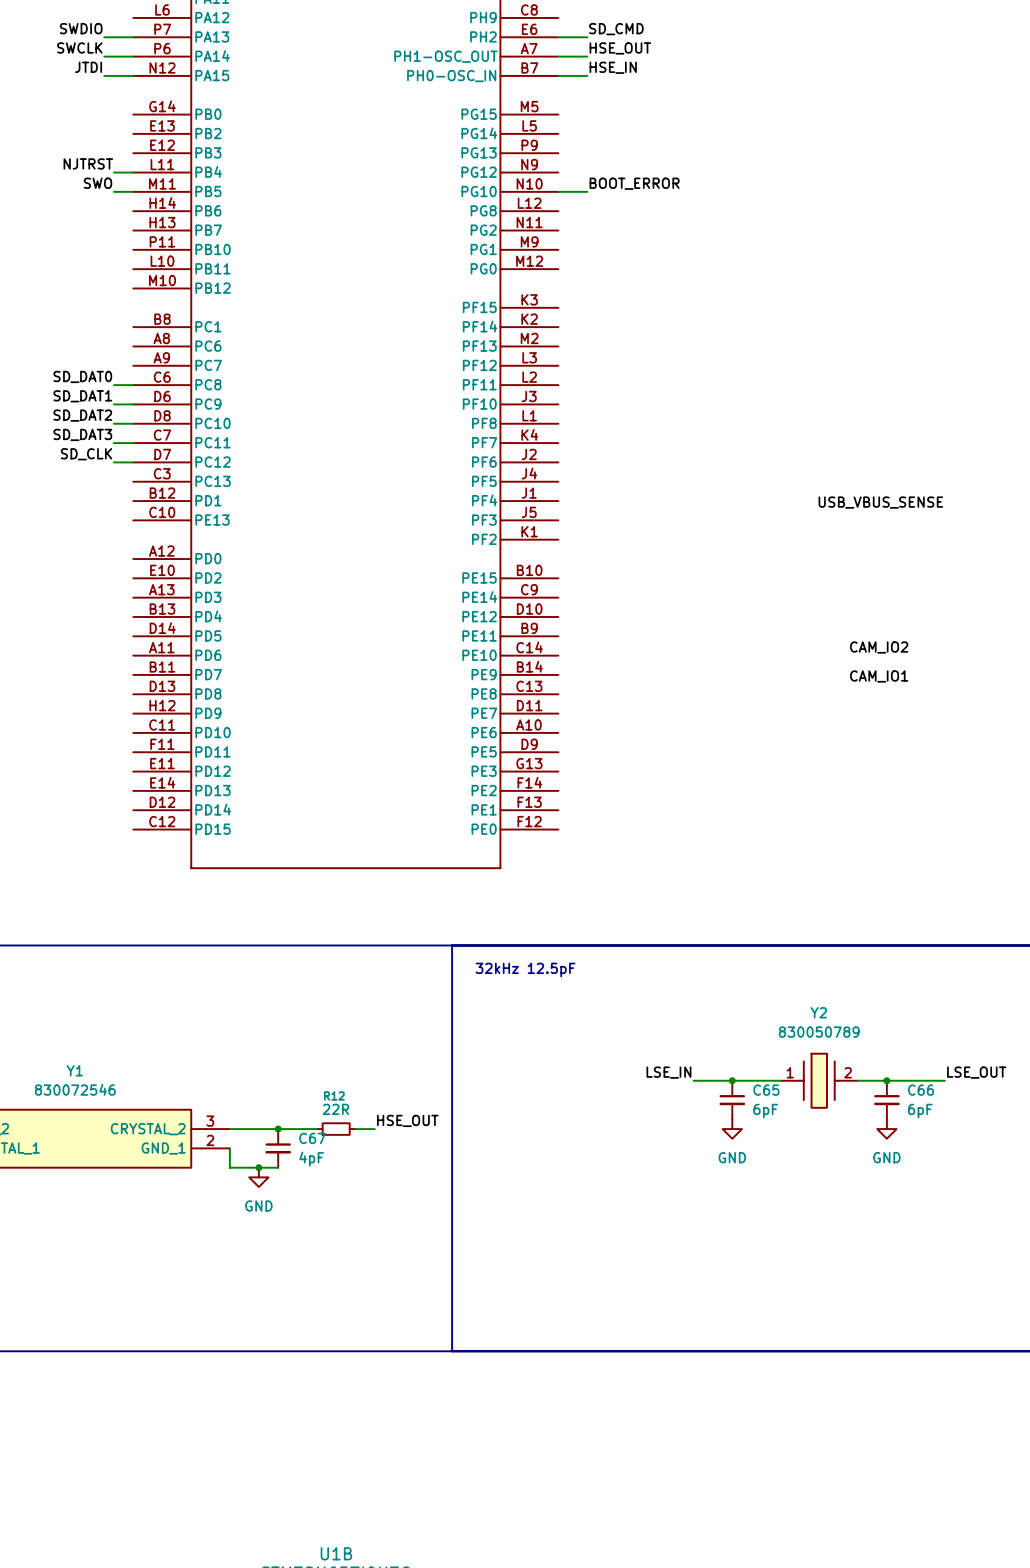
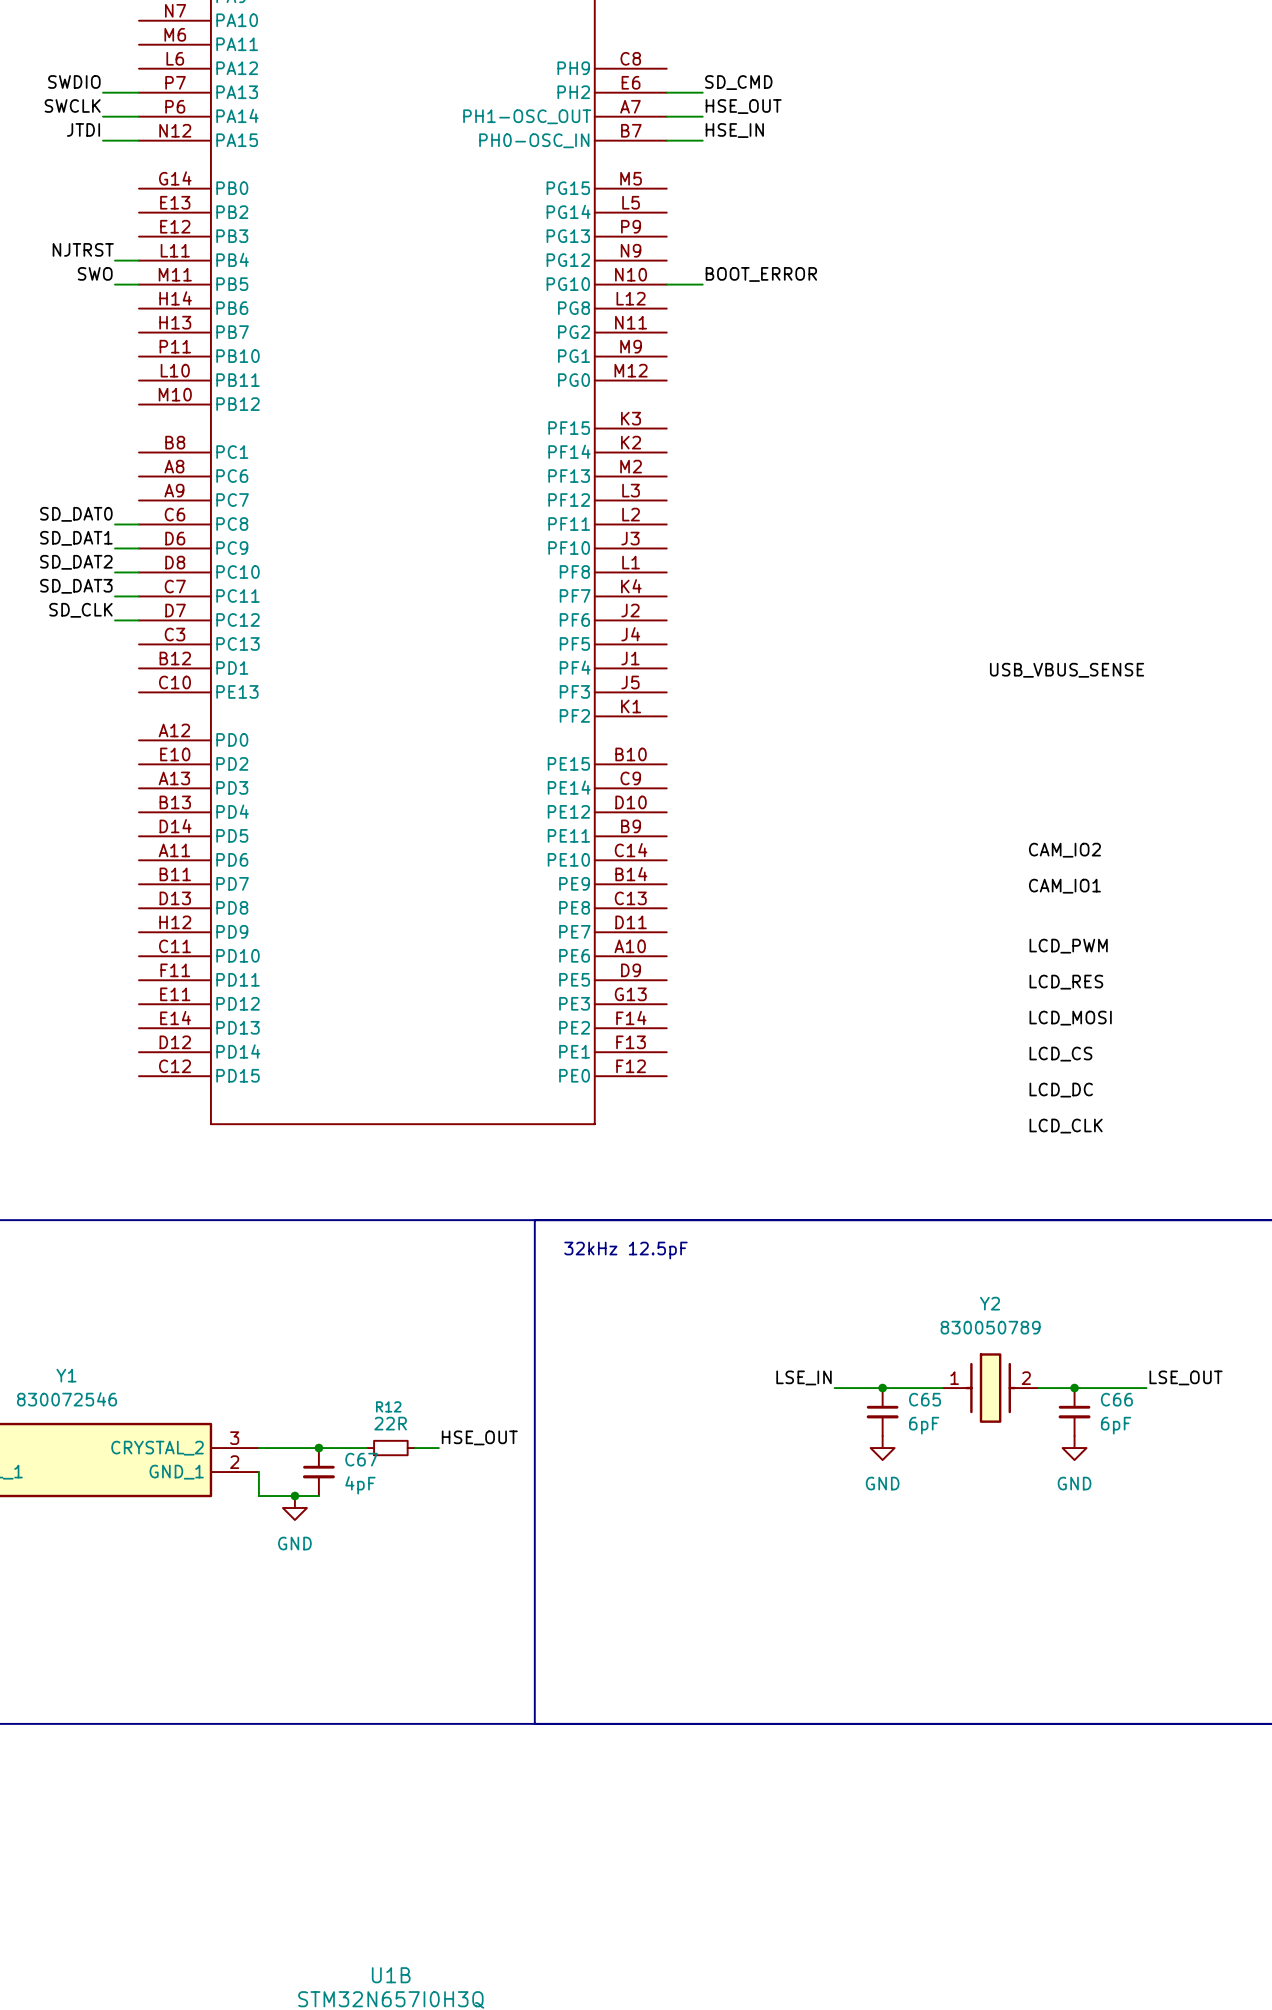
label: none -> LCD_PWM (1068, 946)
label: none -> LCD_RES (1066, 982)
label: none -> LCD_MOSI (1070, 1018)
label: none -> LCD_CS (1060, 1054)
label: none -> LCD_DC (1061, 1090)
label: none -> LCD_CLK (1066, 1126)

